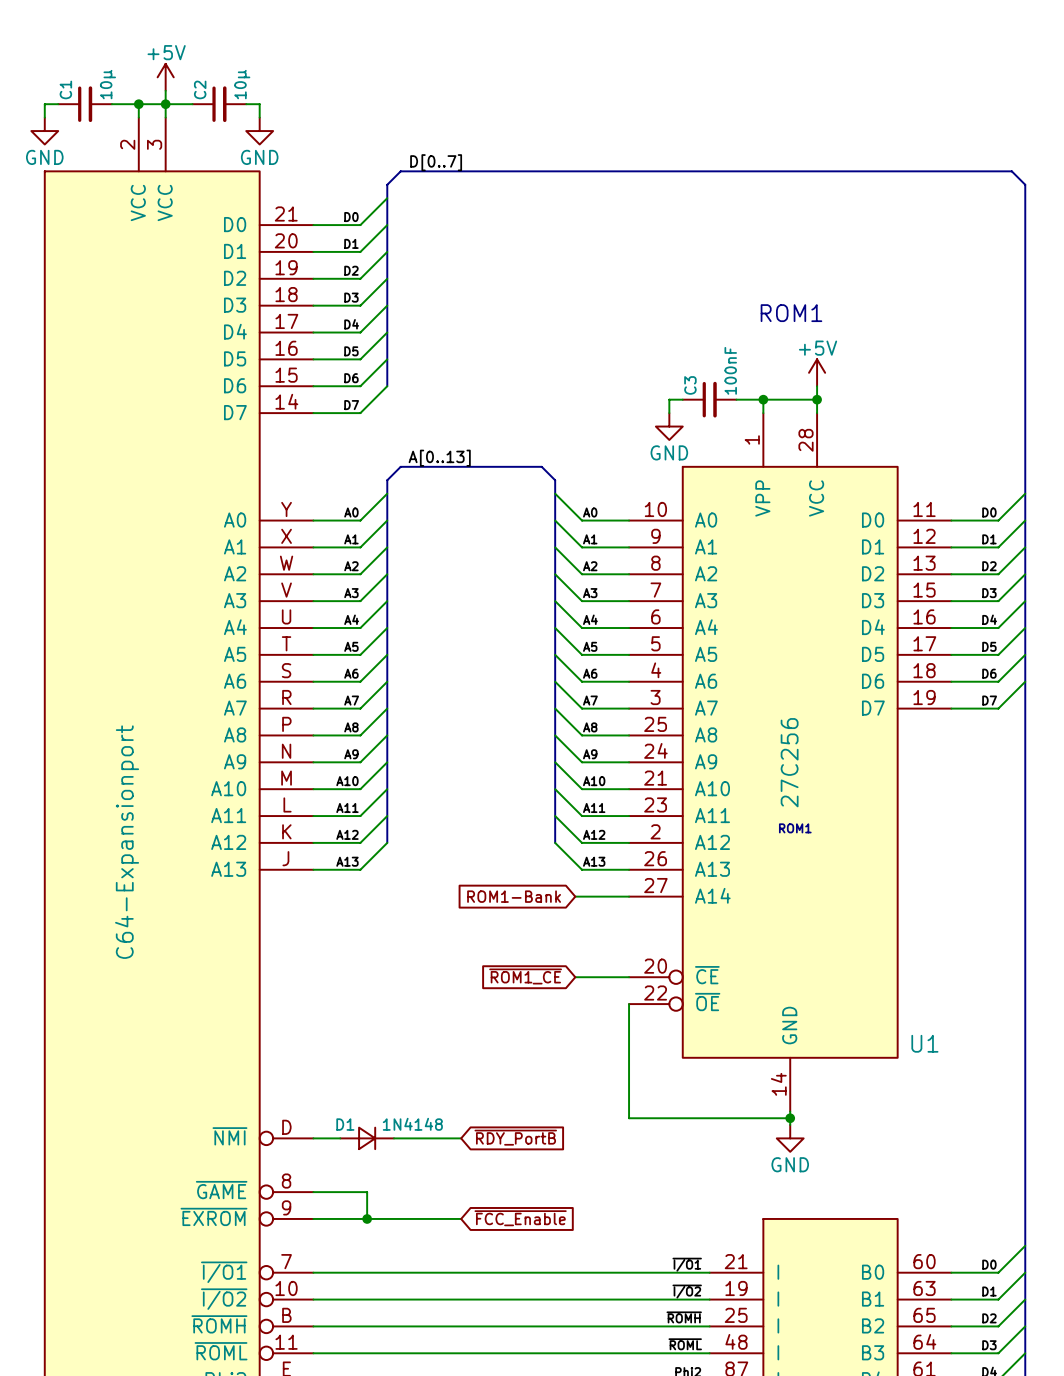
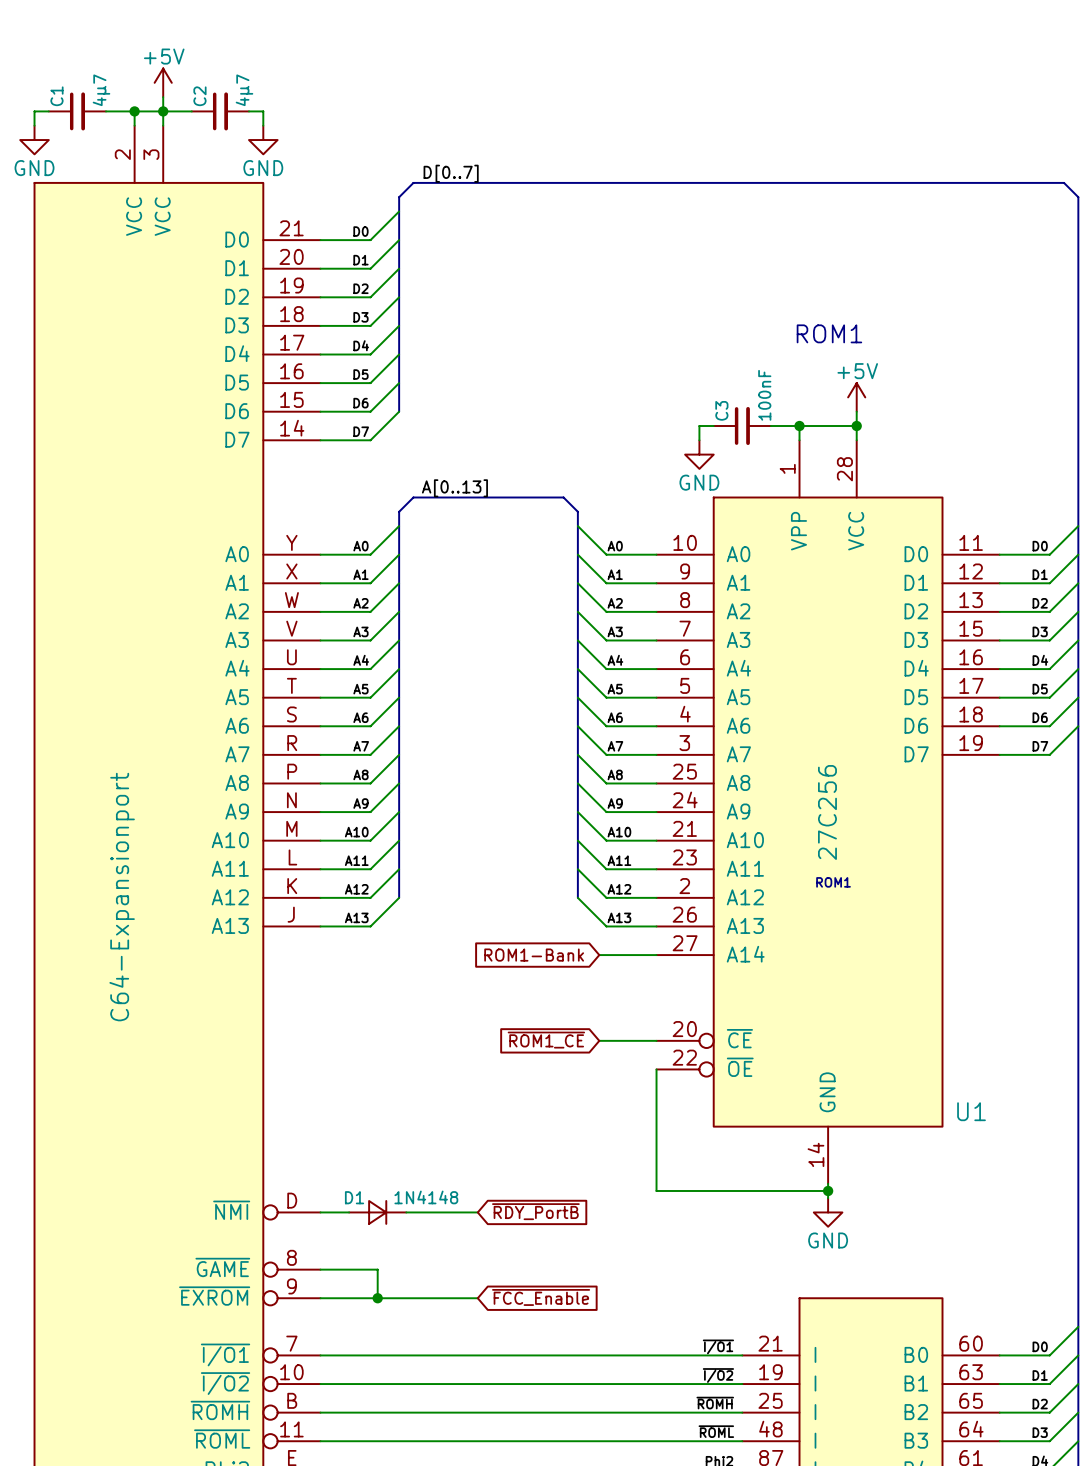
C1 value: 10µ (107, 84) -> 4µ7 (101, 90)
C2 value: 10µ (242, 84) -> 4µ7 (244, 90)

